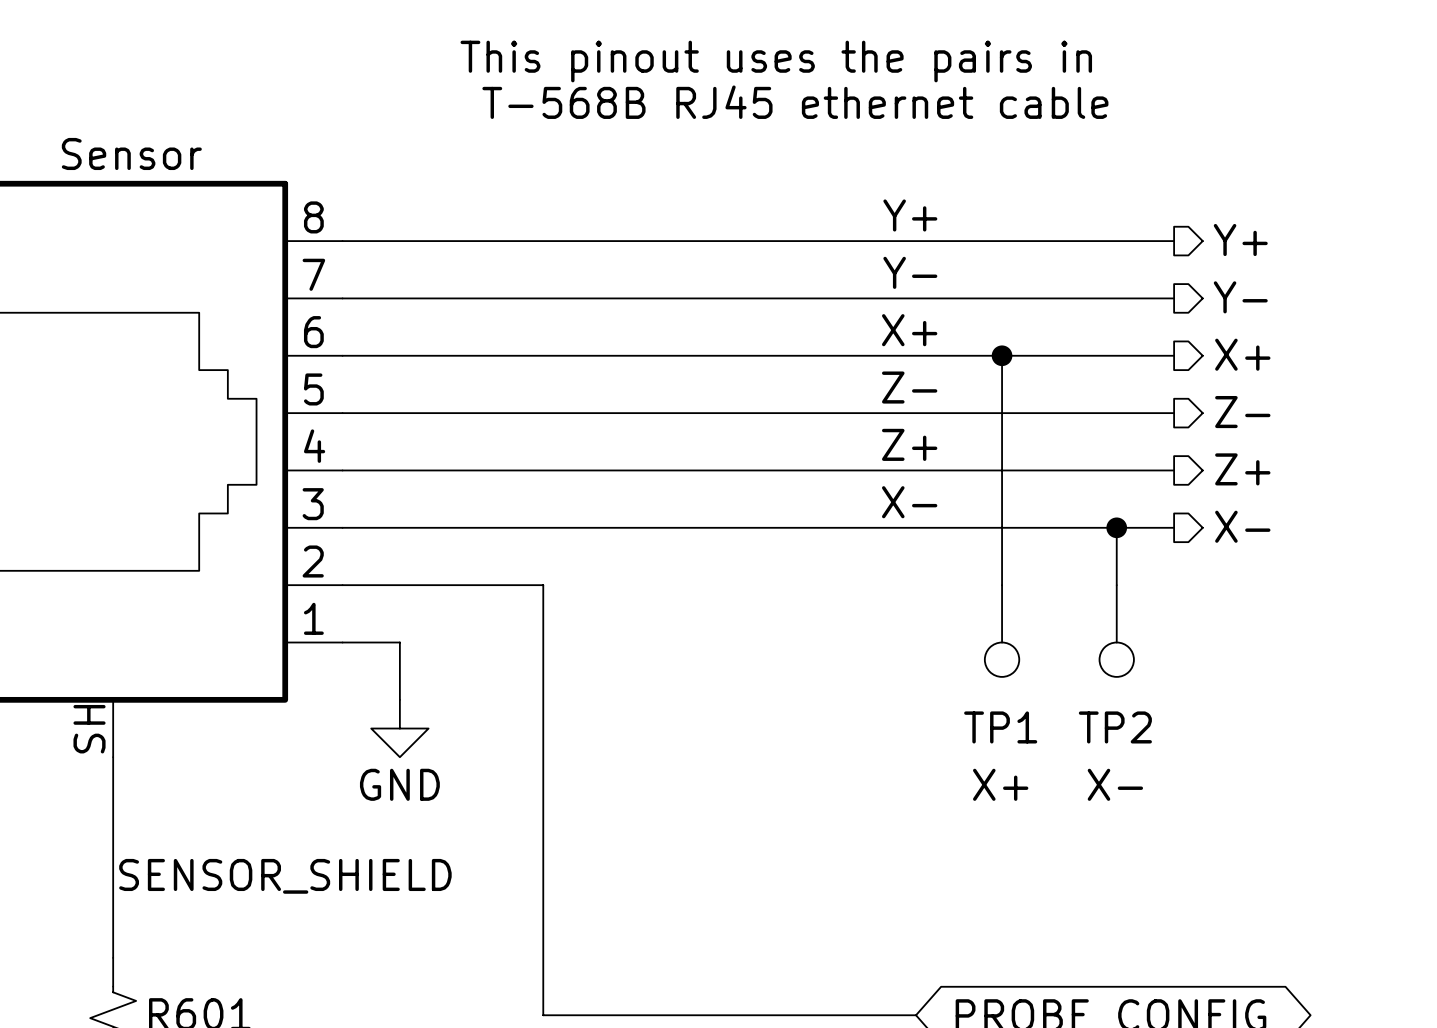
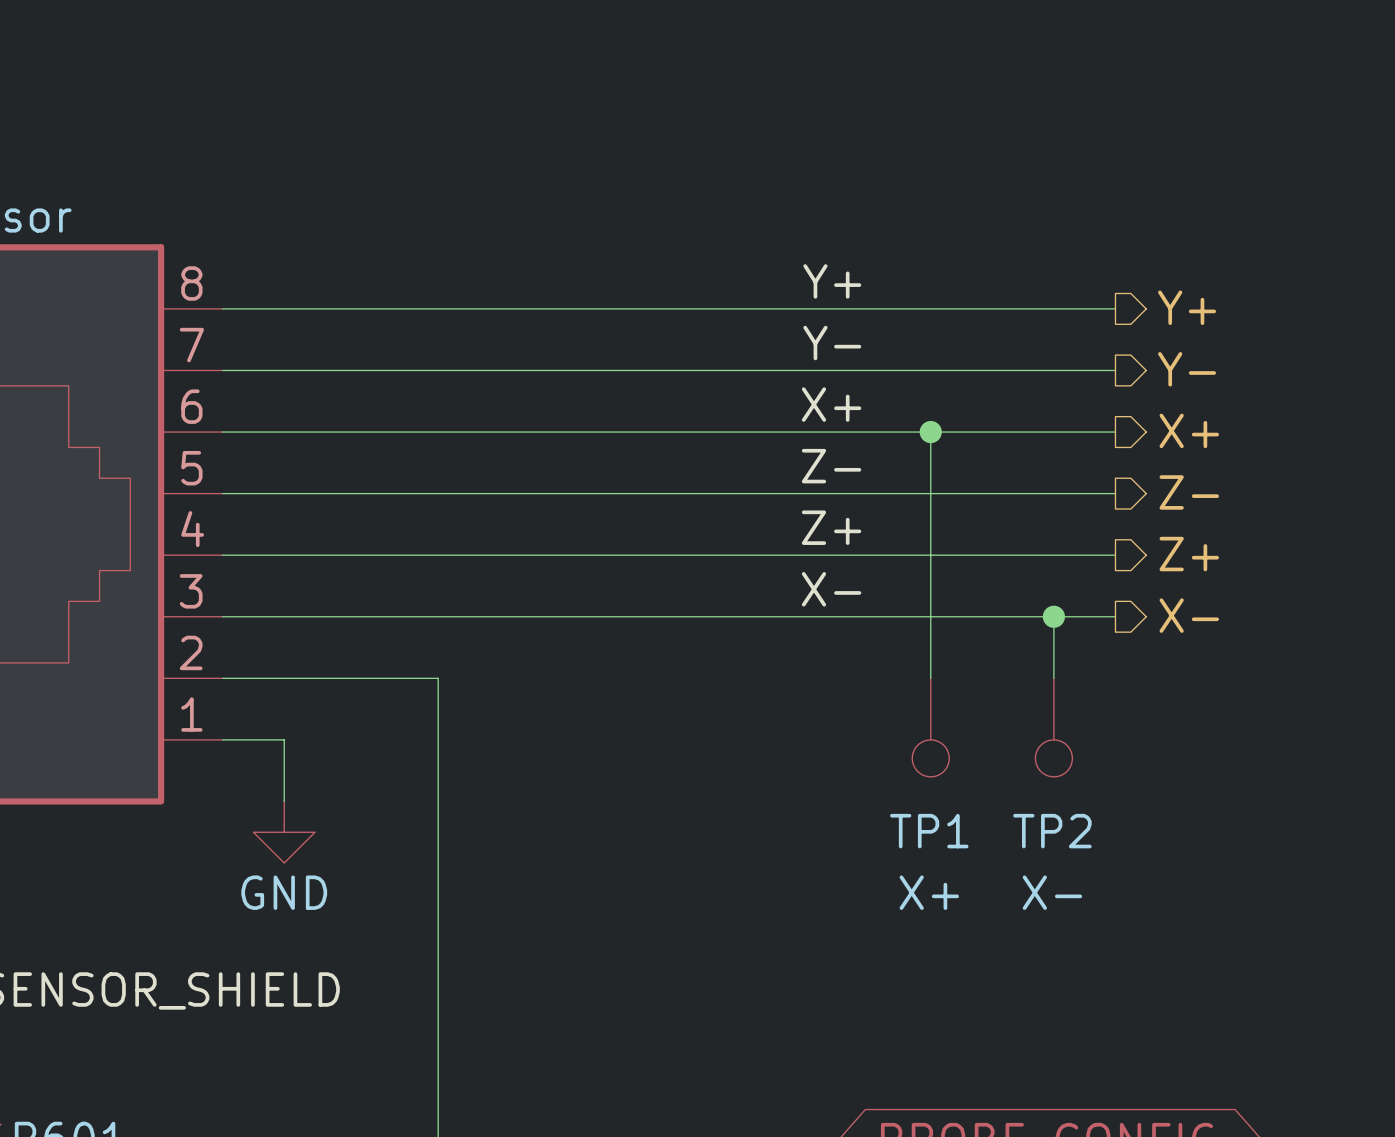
text: This pinout uses the pairs in (776, 61) -> none
text: T-568B RJ45 ethernet cable (795, 102) -> none

